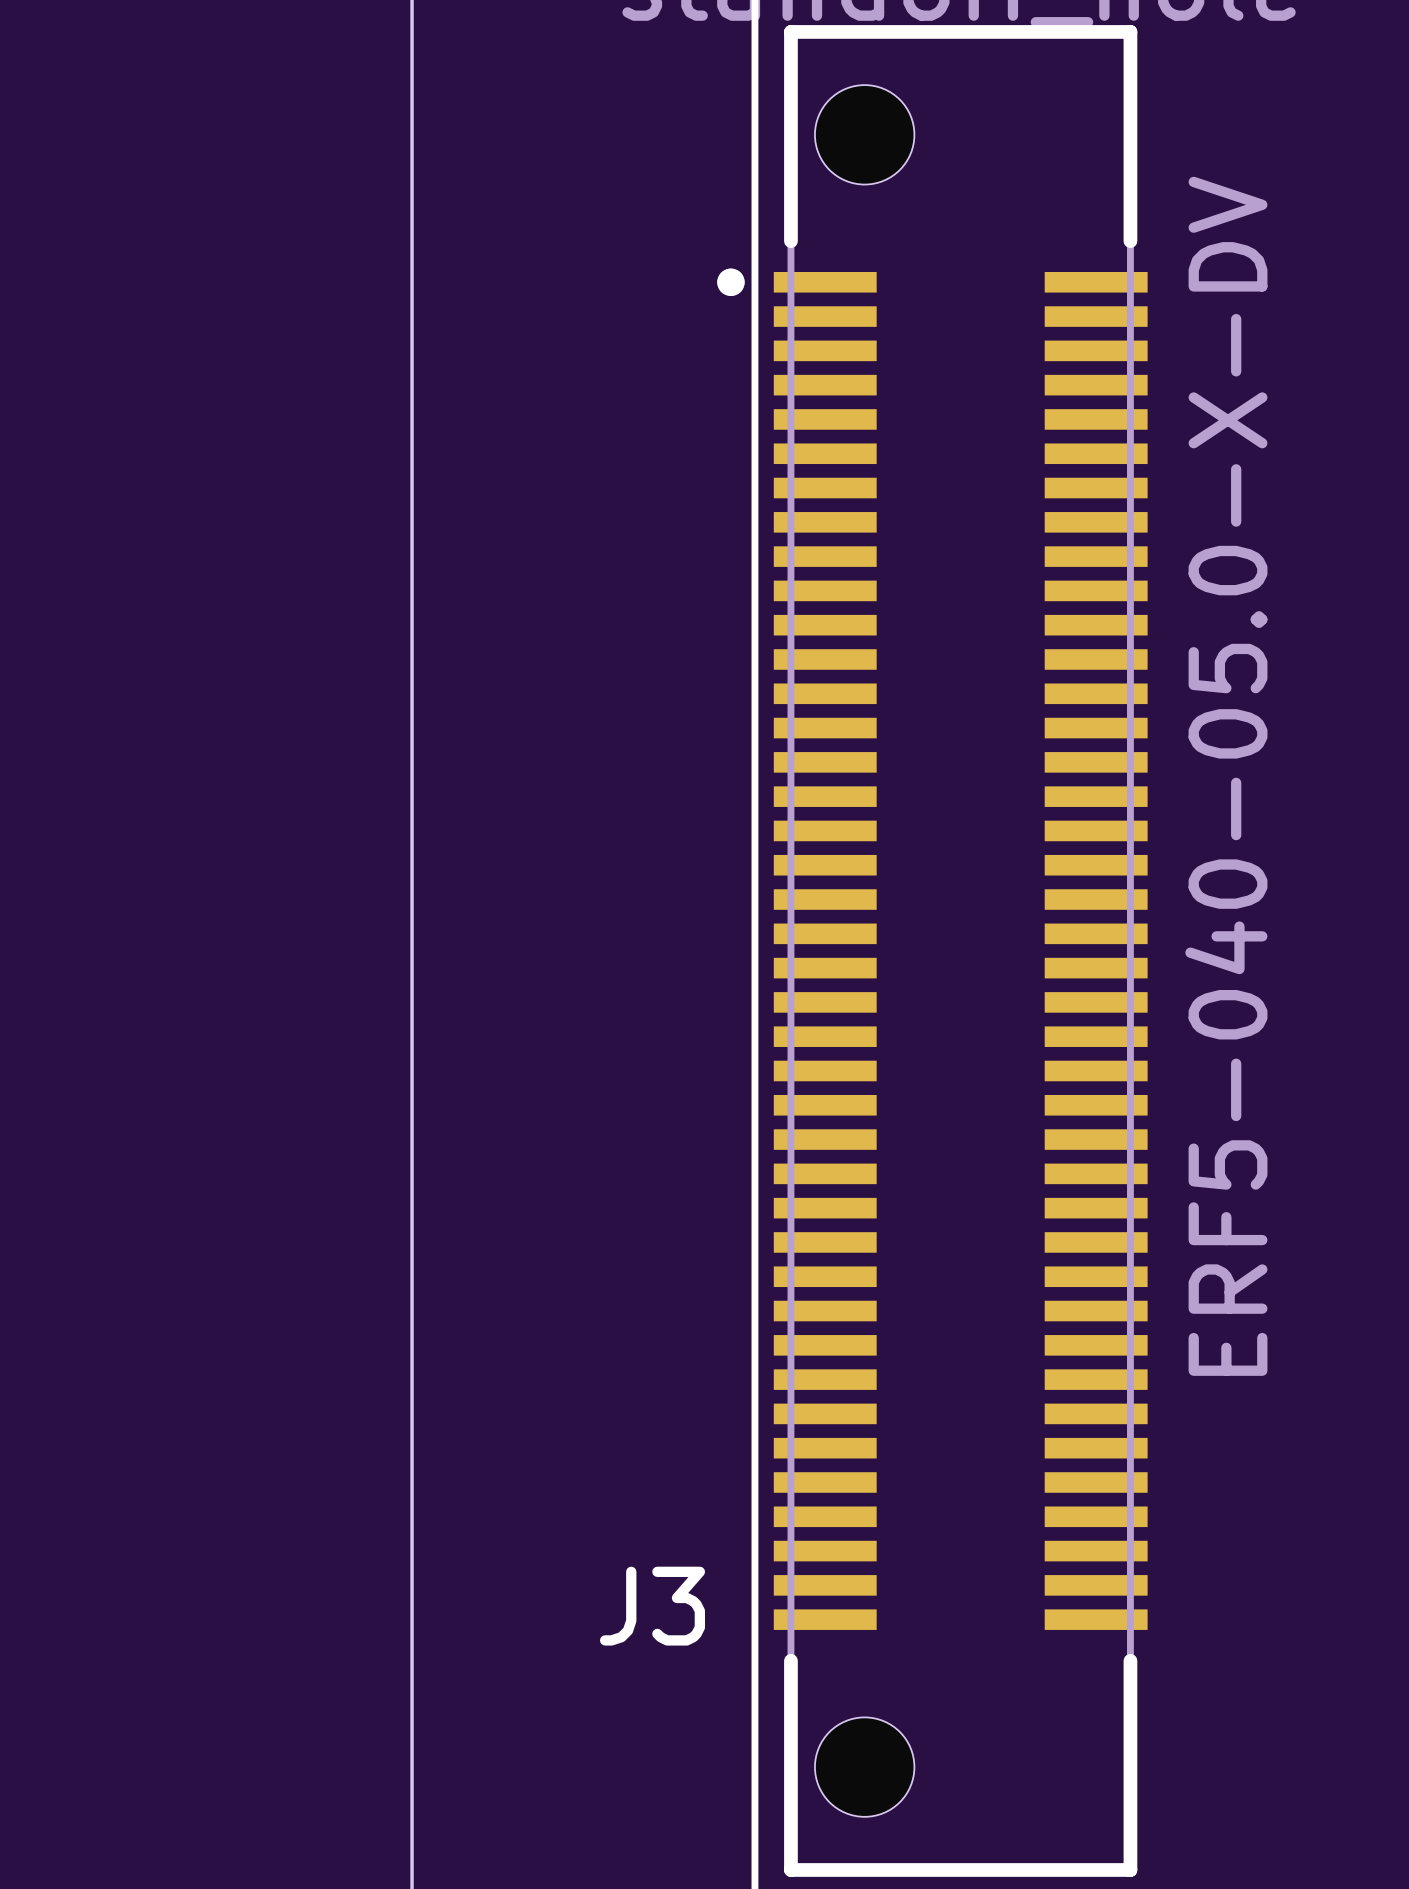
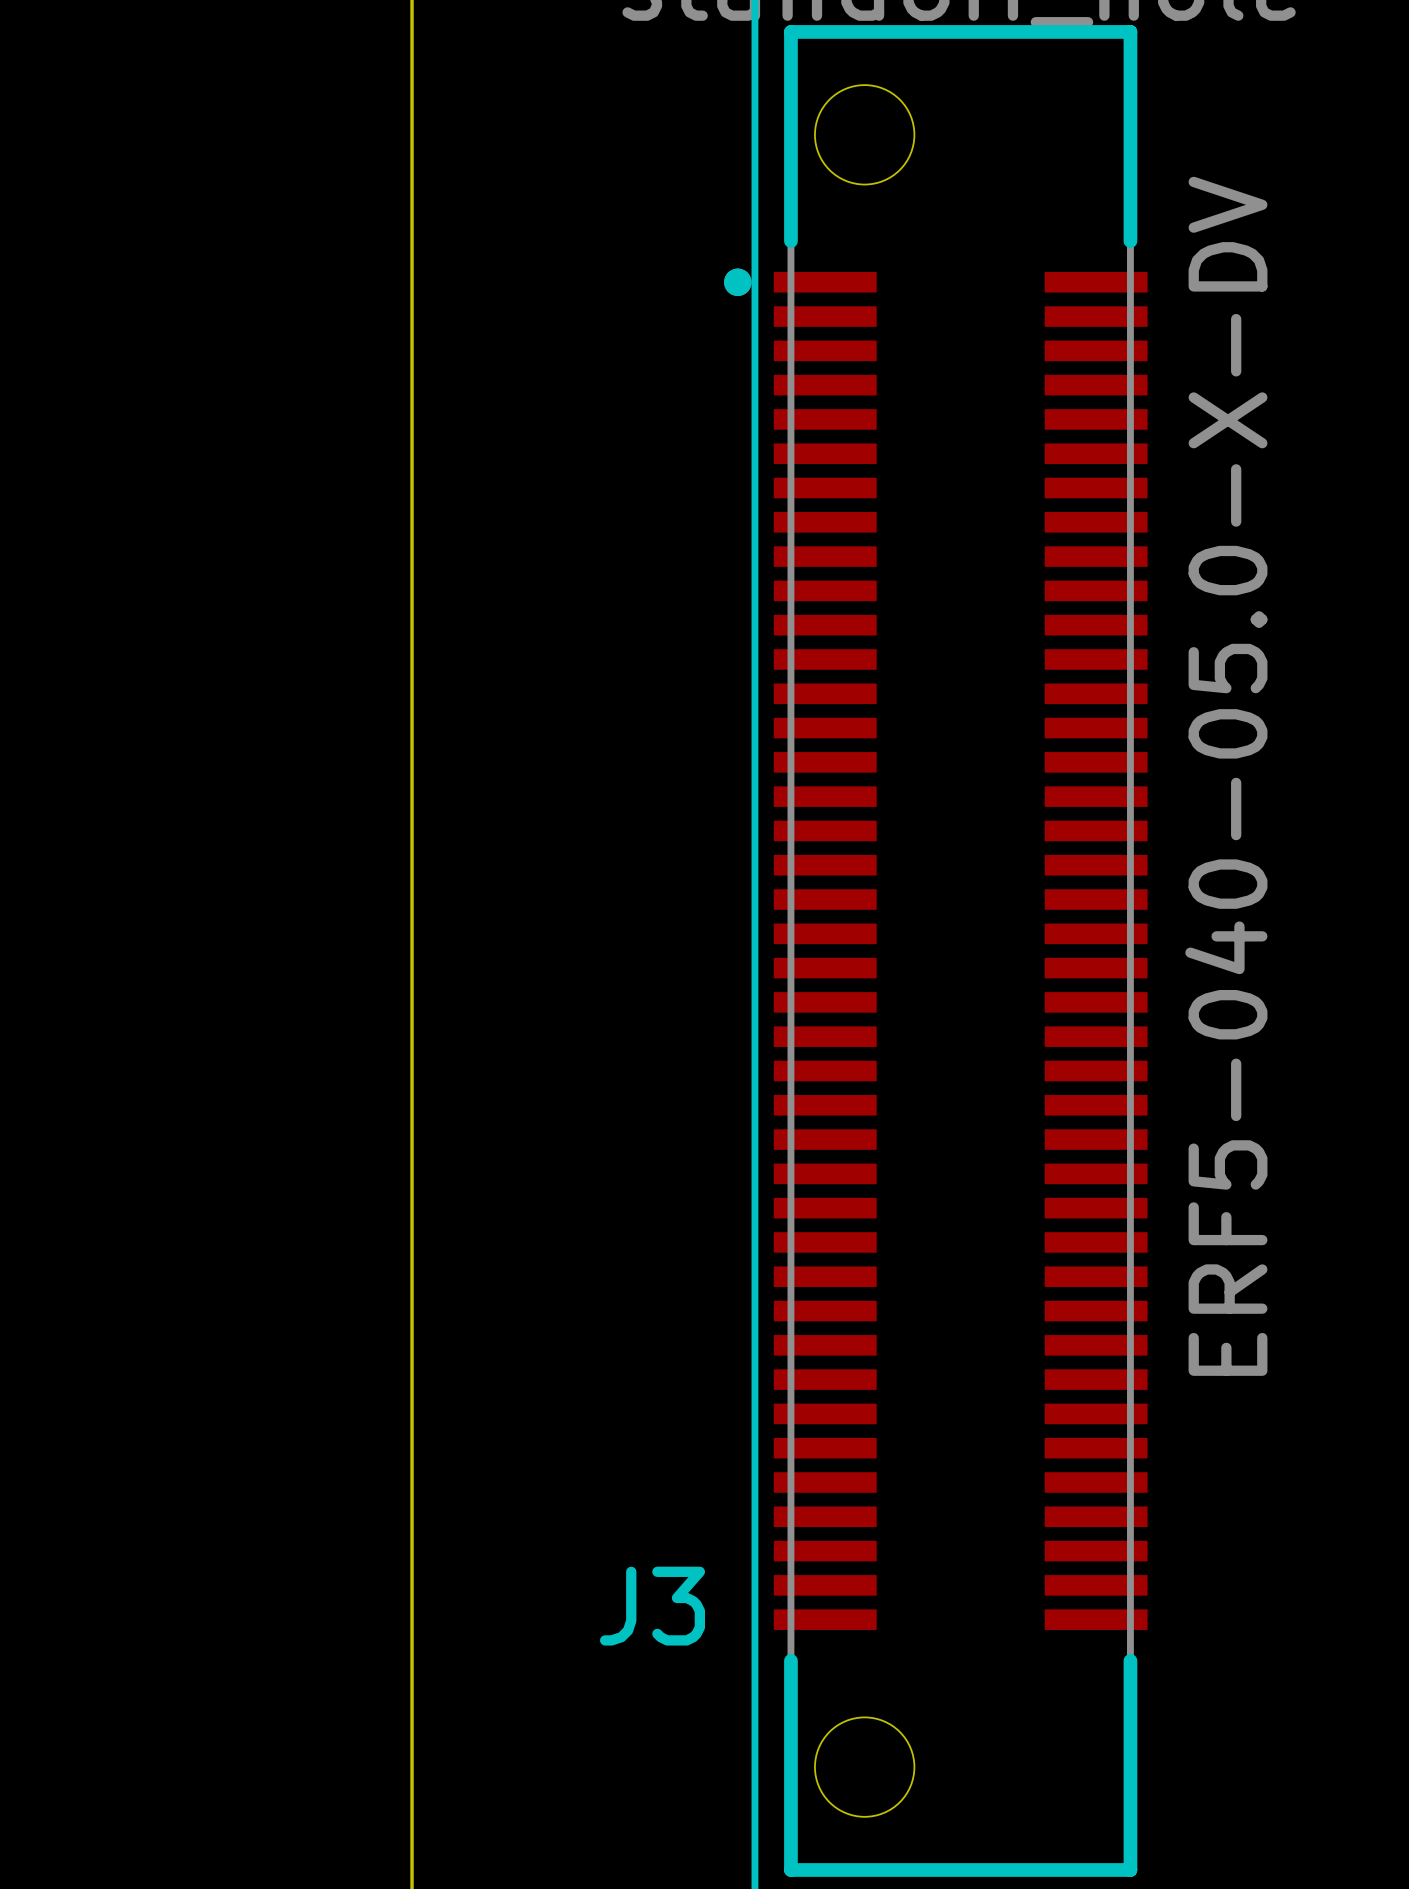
J3 footprint: [717, 25, 1148, 1877] -> [724, 25, 1148, 1877]

